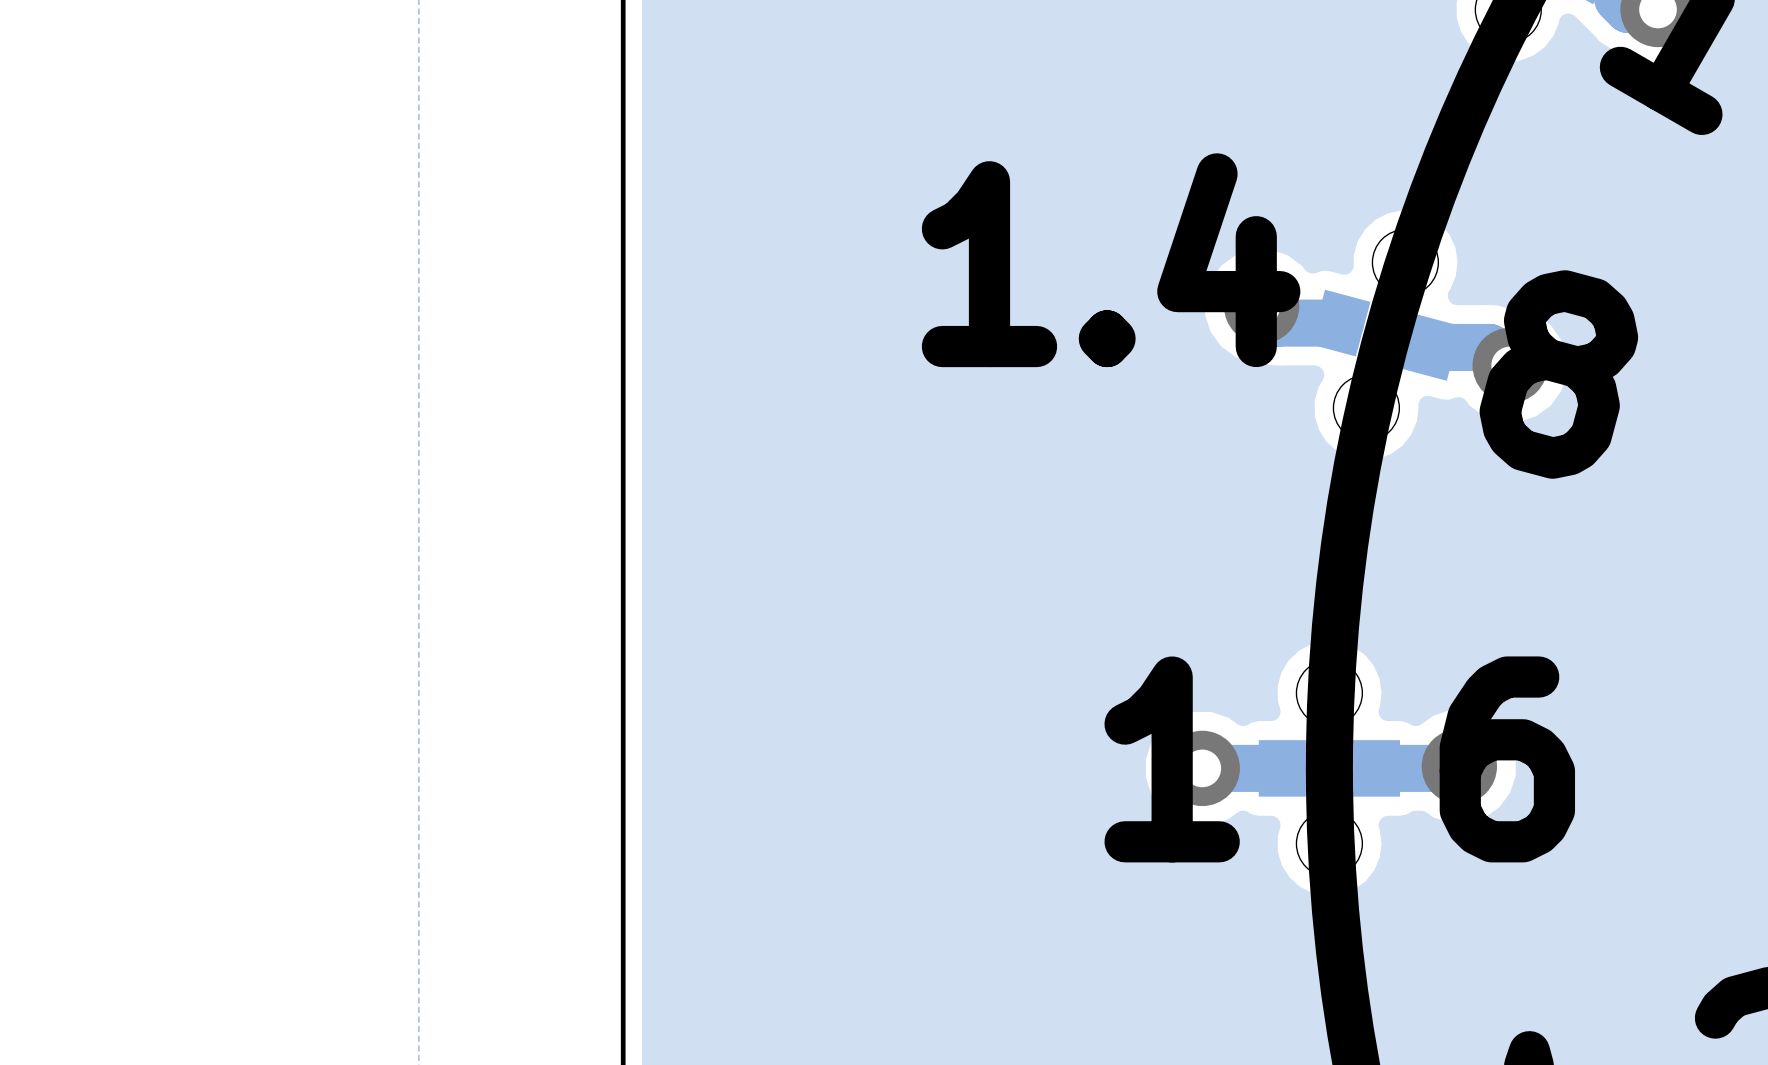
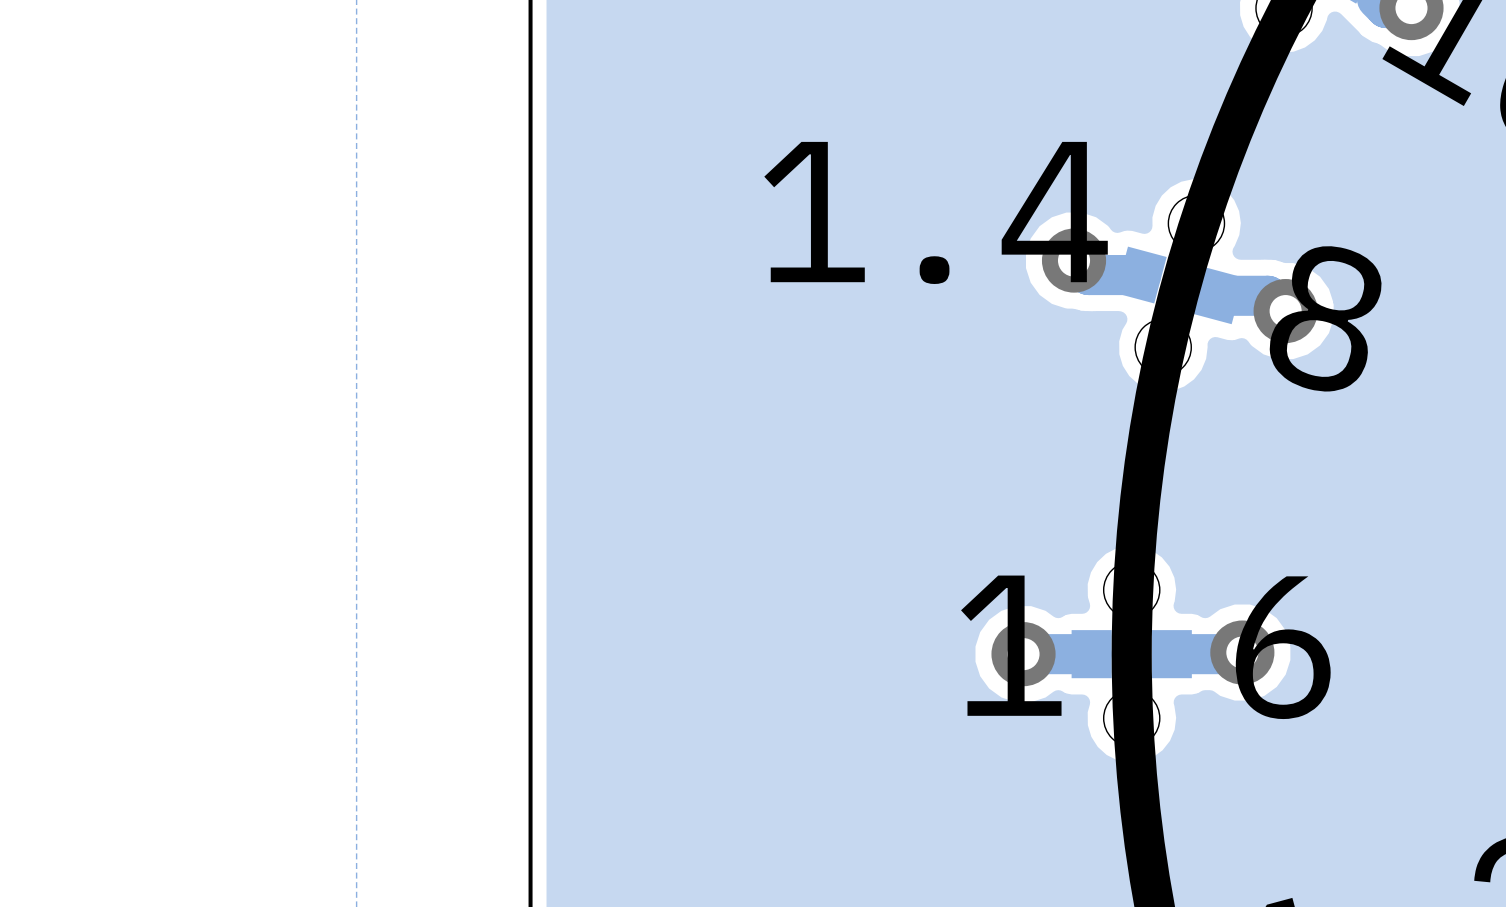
text position: 1.4 (1111, 260) -> 1.4 (936, 212)
text position: 1 (1172, 759) -> 1 (1011, 645)

